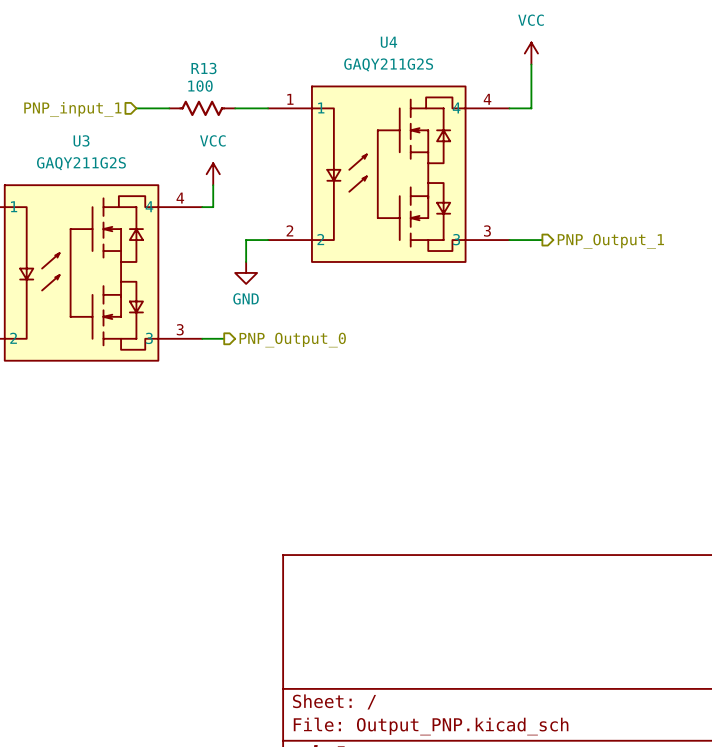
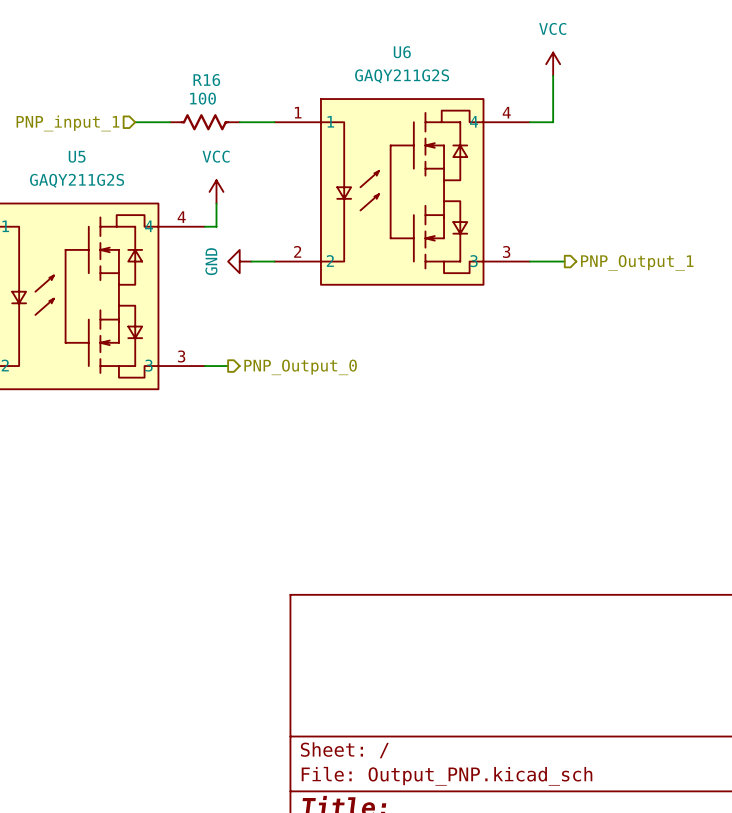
U4 name: U4 (388, 42) -> U6 (402, 52)
R13 name: R13 (203, 68) -> R16 (206, 80)
U3 name: U3 (81, 140) -> U5 (77, 156)
wire: (246, 240) (246, 261) -> none
power symbol rotation: 0° (246, 272) -> 90° clockwise (239, 261)
power symbol position: GND (246, 272) -> GND (239, 261)

